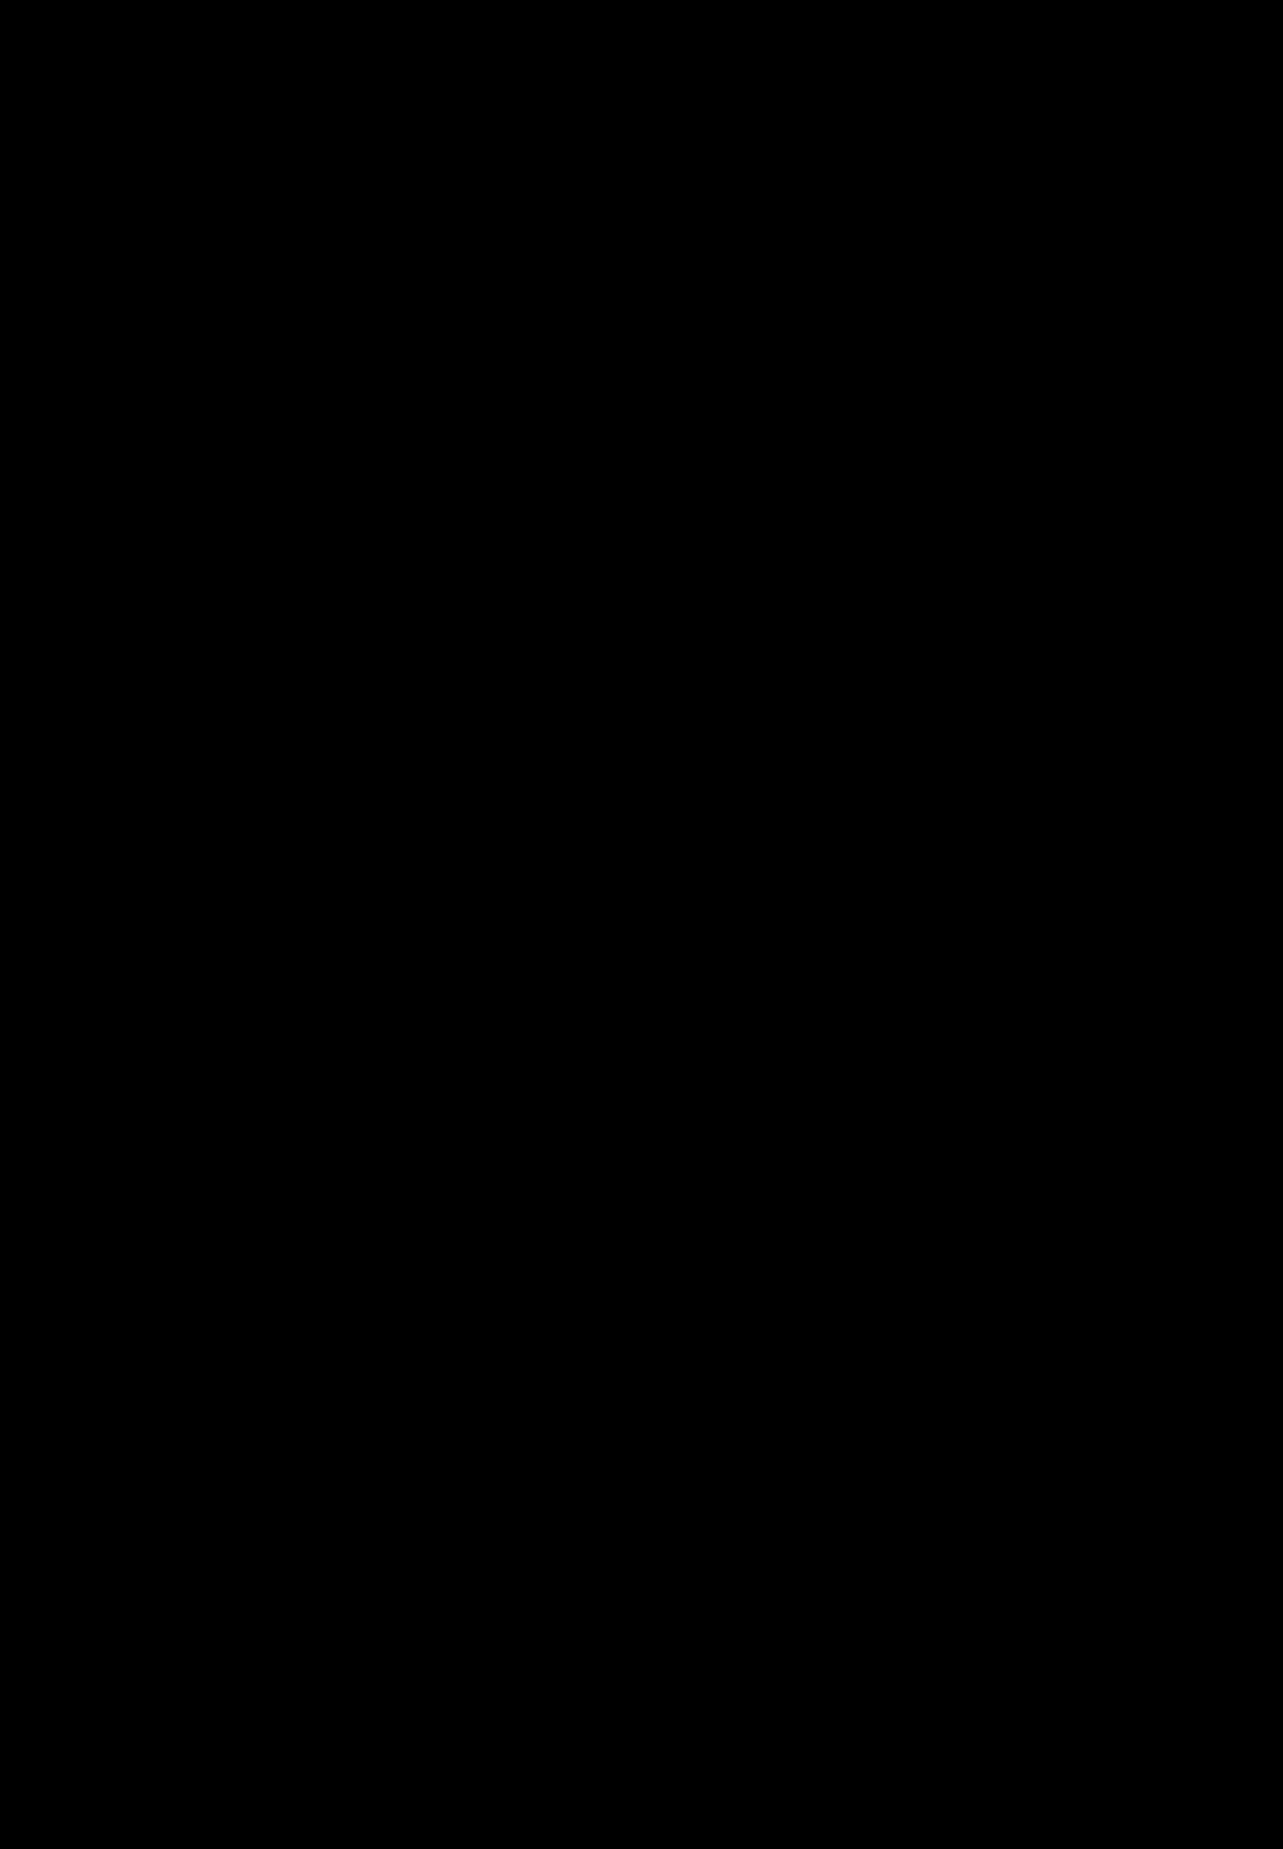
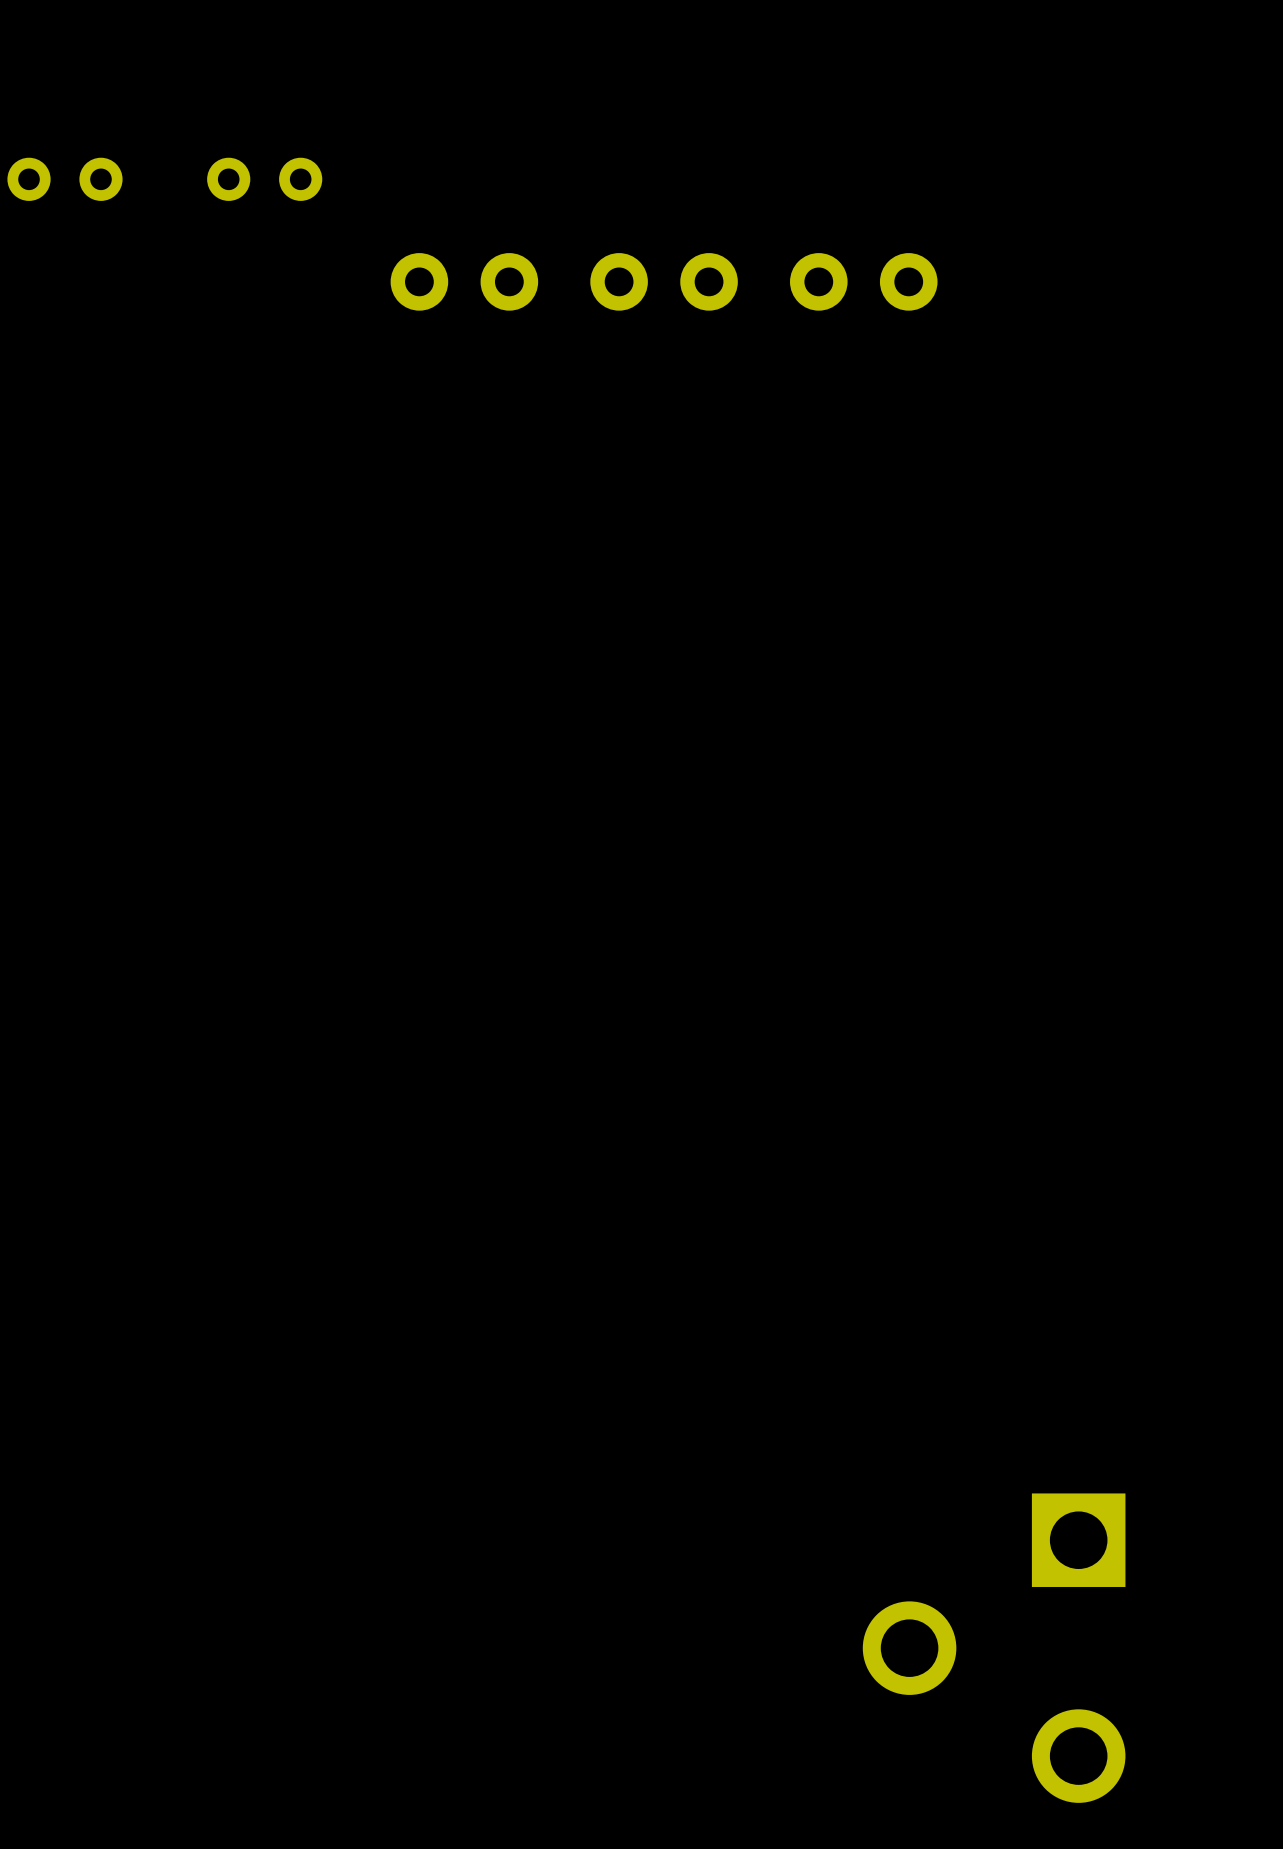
part: none -> (65, 179)
part: none -> (264, 179)
part: none -> (464, 281)
part: none -> (664, 281)
part: none -> (863, 281)
part: none -> (994, 1648)

